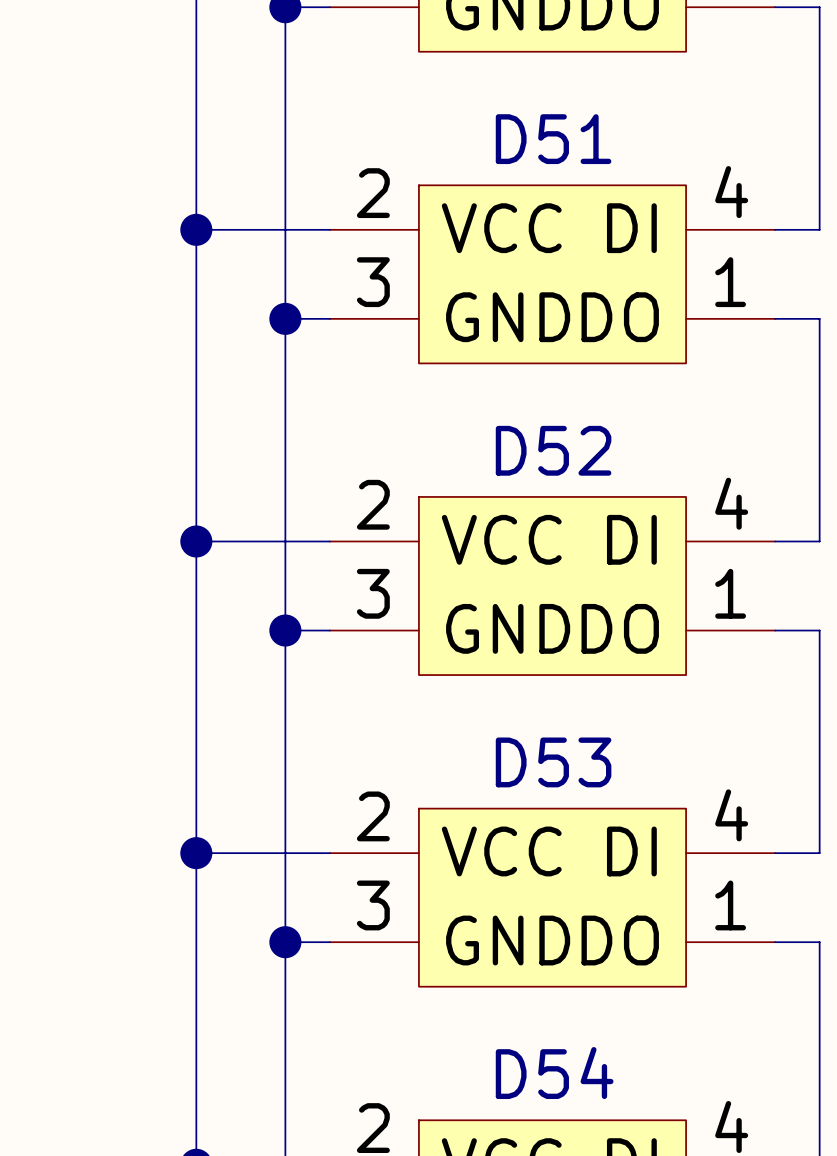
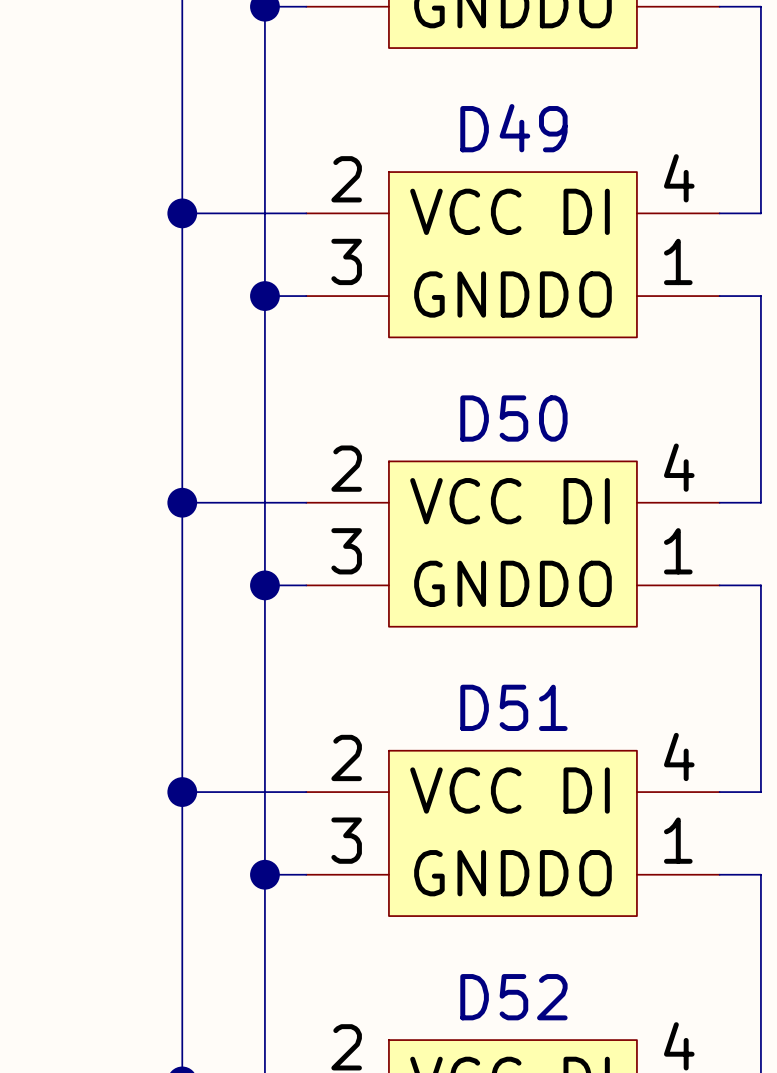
D51 name: D51 (553, 139) -> D49 (513, 128)
D52 name: D52 (553, 450) -> D50 (513, 418)
D53 name: D53 (553, 762) -> D51 (513, 707)
D54 name: D54 (554, 1073) -> D52 (513, 997)

